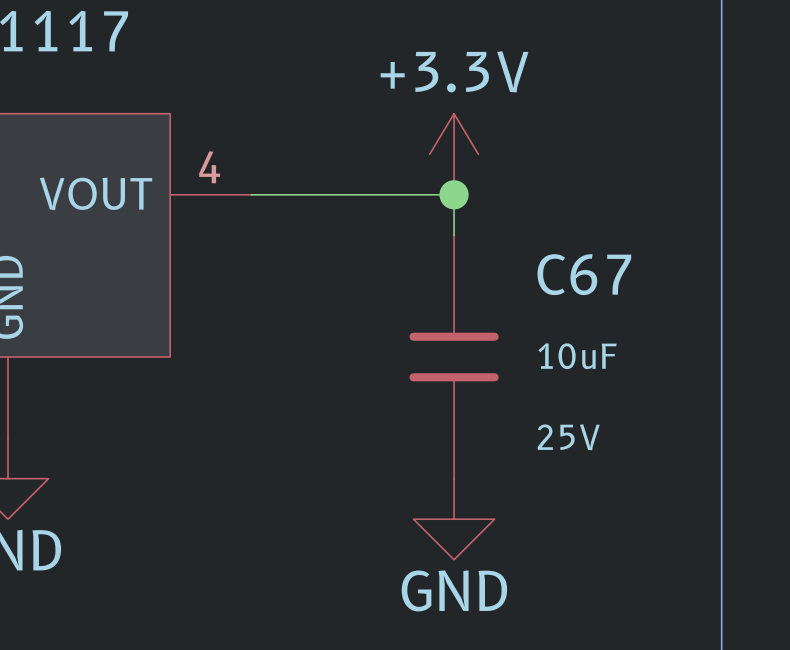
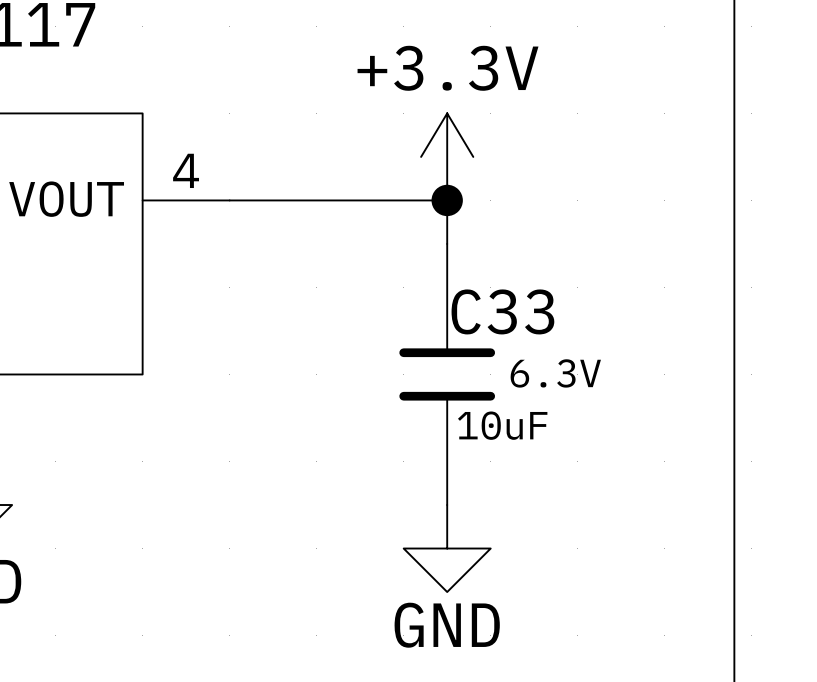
C67 name: C67 (584, 274) -> C33 (502, 311)
C67 value position: 10uF (577, 356) -> 10uF (502, 425)
C67 text: 25V (568, 437) -> 6.3V (555, 373)

